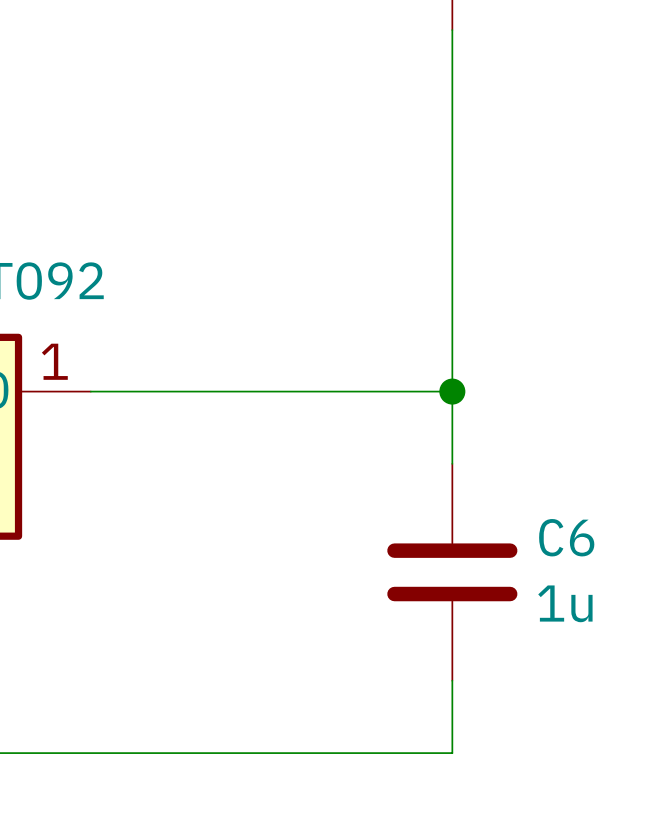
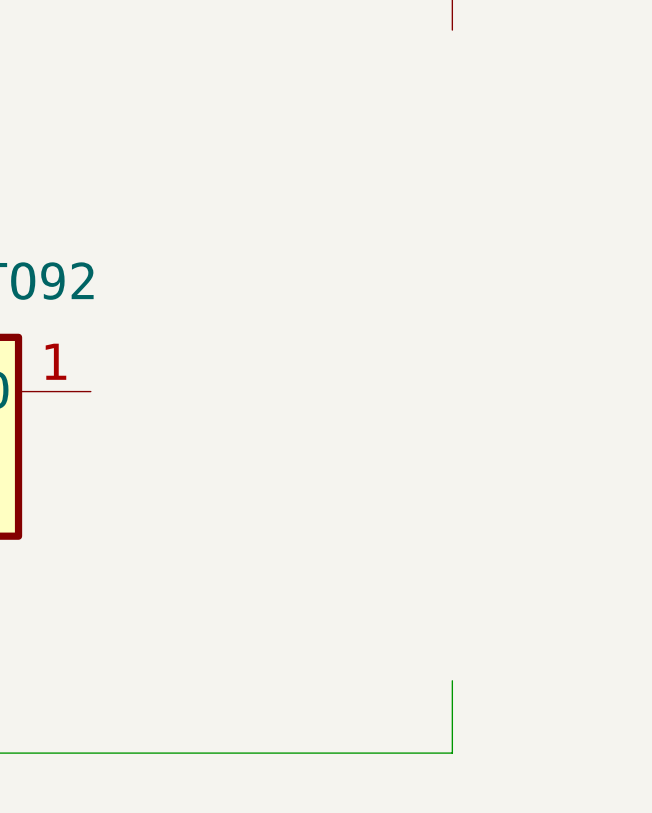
wire: (452, 30) (452, 463) -> none
wire: (90, 391) (452, 391) -> none
junction: (452, 391) -> none
C6: 1u (452, 572) -> none

